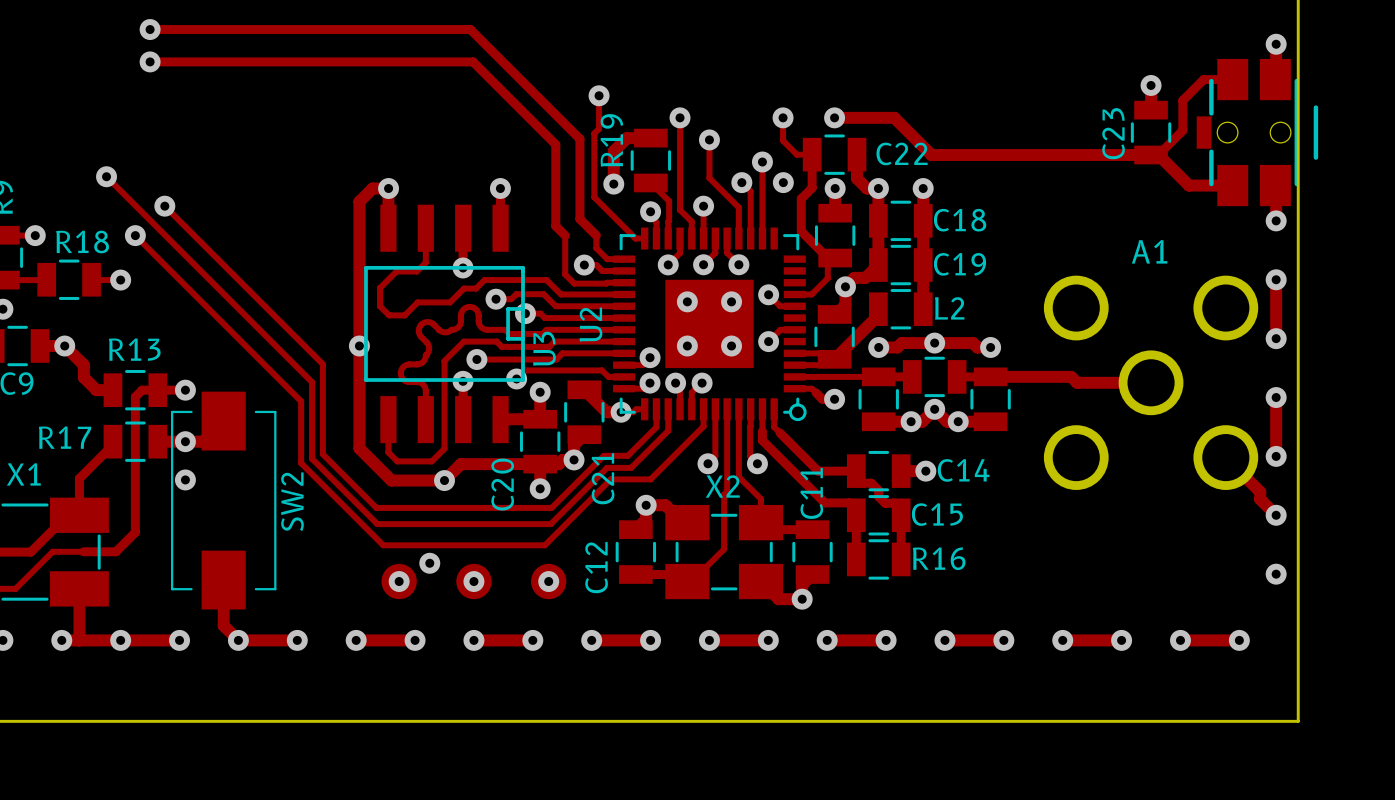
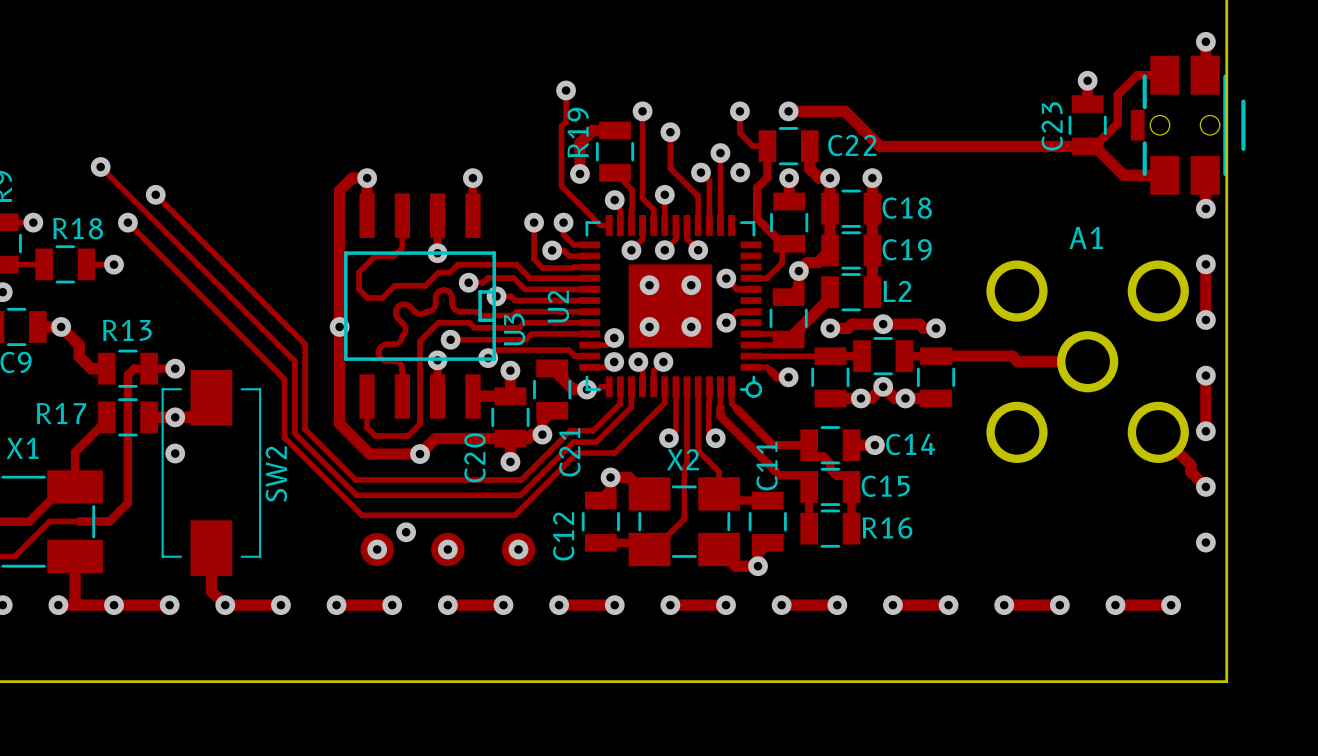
track: (150, 29) (470, 29) (579, 139) (579, 219) (596, 235) -> none
via: (150, 29) -> none
track: (150, 61) (473, 61) (555, 144) (555, 226) (565, 235) -> none
via: (150, 61) -> none
via: none -> (534, 222)
via: none -> (563, 222)

